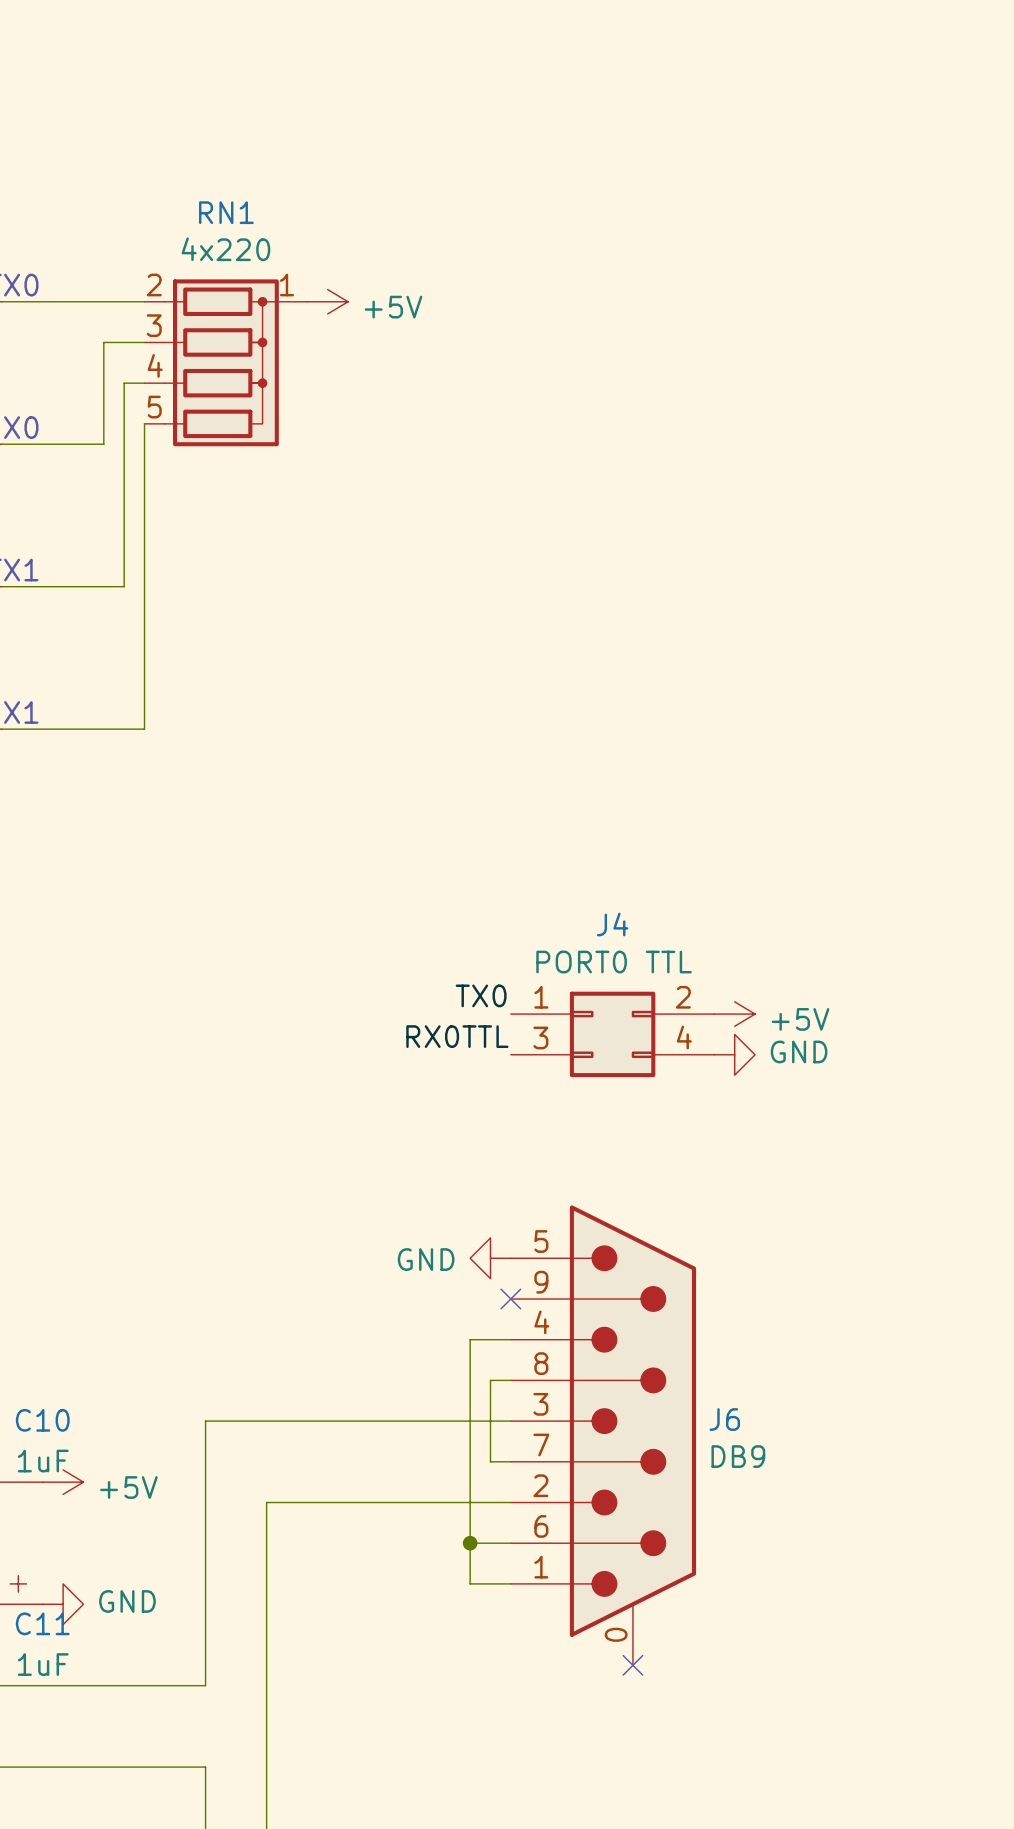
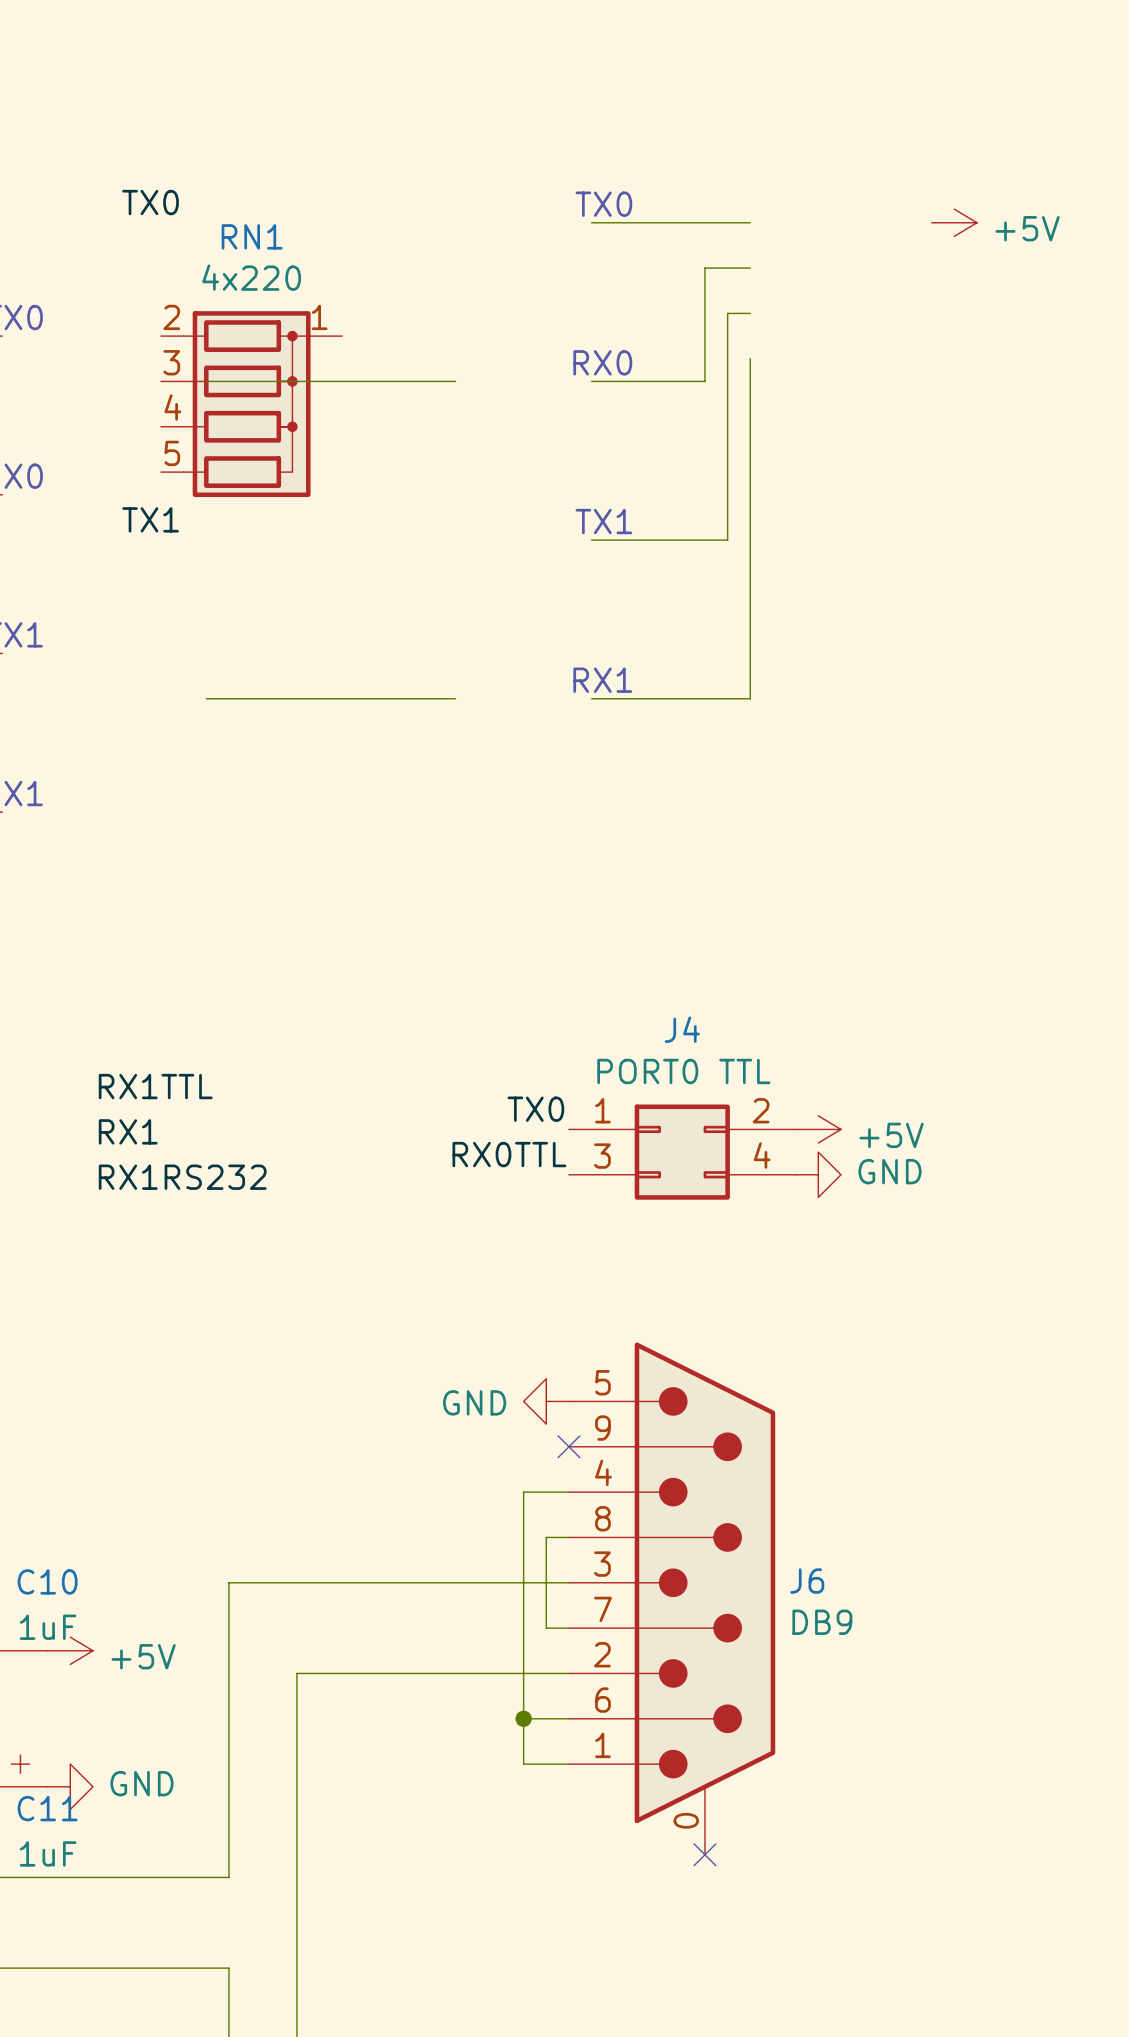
label: none -> TX0 (150, 202)
text: none -> TX0 (603, 204)
wire: none -> (591, 222) (750, 222)
power symbol: none -> +5V (954, 222)
wire: none -> (750, 268) (704, 268) (704, 381) (591, 381)
wire: none -> (750, 313) (727, 313) (727, 540) (591, 540)
wire: (2, 301) (144, 301) -> none
power symbol: +5V (327, 301) -> none
wire: none -> (750, 358) (750, 698) (591, 698)
text: none -> RX0 (602, 362)
wire: (144, 342) (103, 342) (103, 444) (2, 444) -> none
wire: none -> (206, 381) (455, 381)
wire: (144, 383) (124, 383) (124, 586) (2, 586) -> none
wire: (144, 423) (144, 729) (2, 729) -> none
label: none -> TX1 (150, 519)
text: none -> TX1 (603, 521)
text: none -> RX1 (602, 680)
wire: none -> (206, 698) (455, 698)
label: none -> RX1TTL (155, 1086)
label: none -> RX1 (128, 1131)
label: none -> RX1RS232 (182, 1177)

